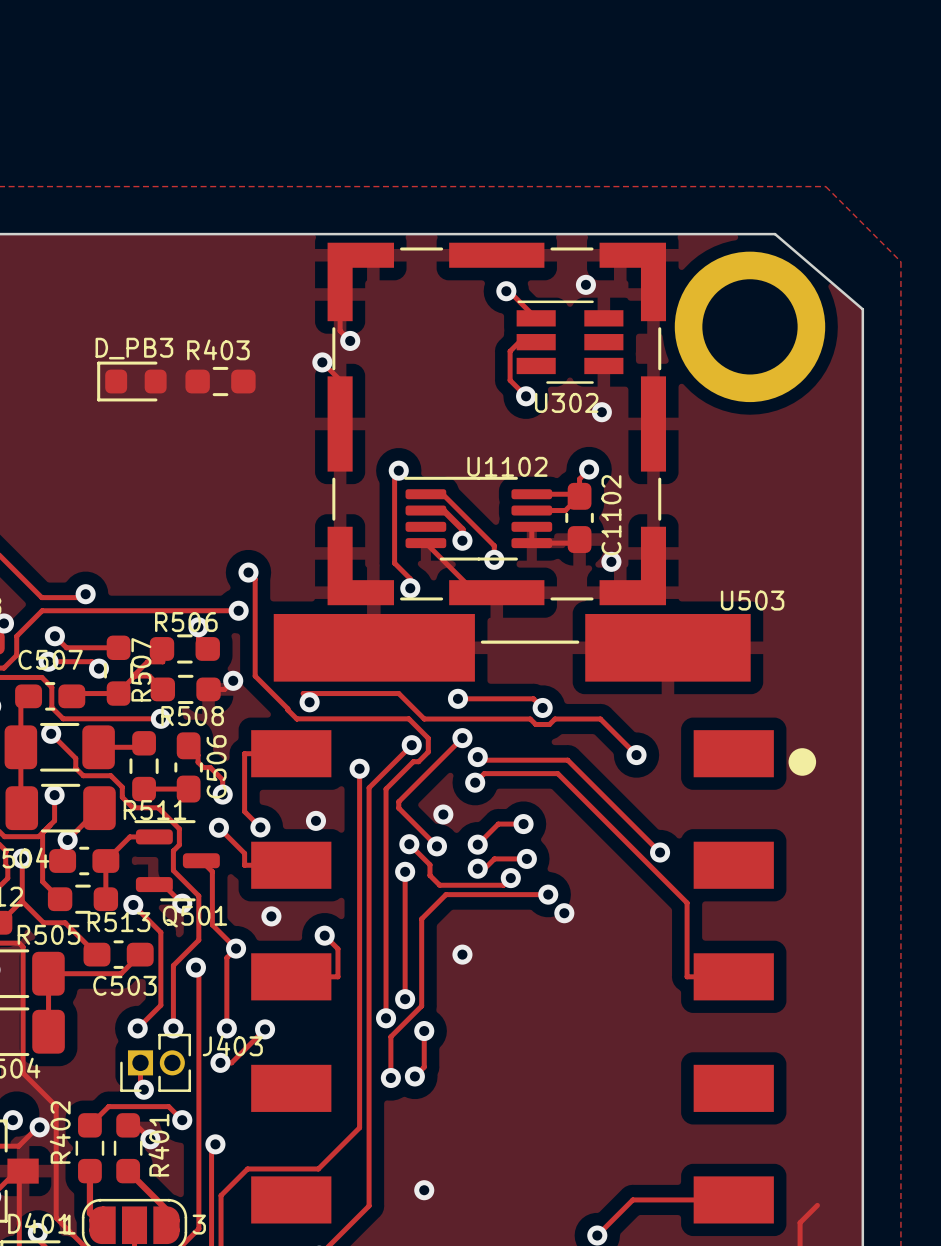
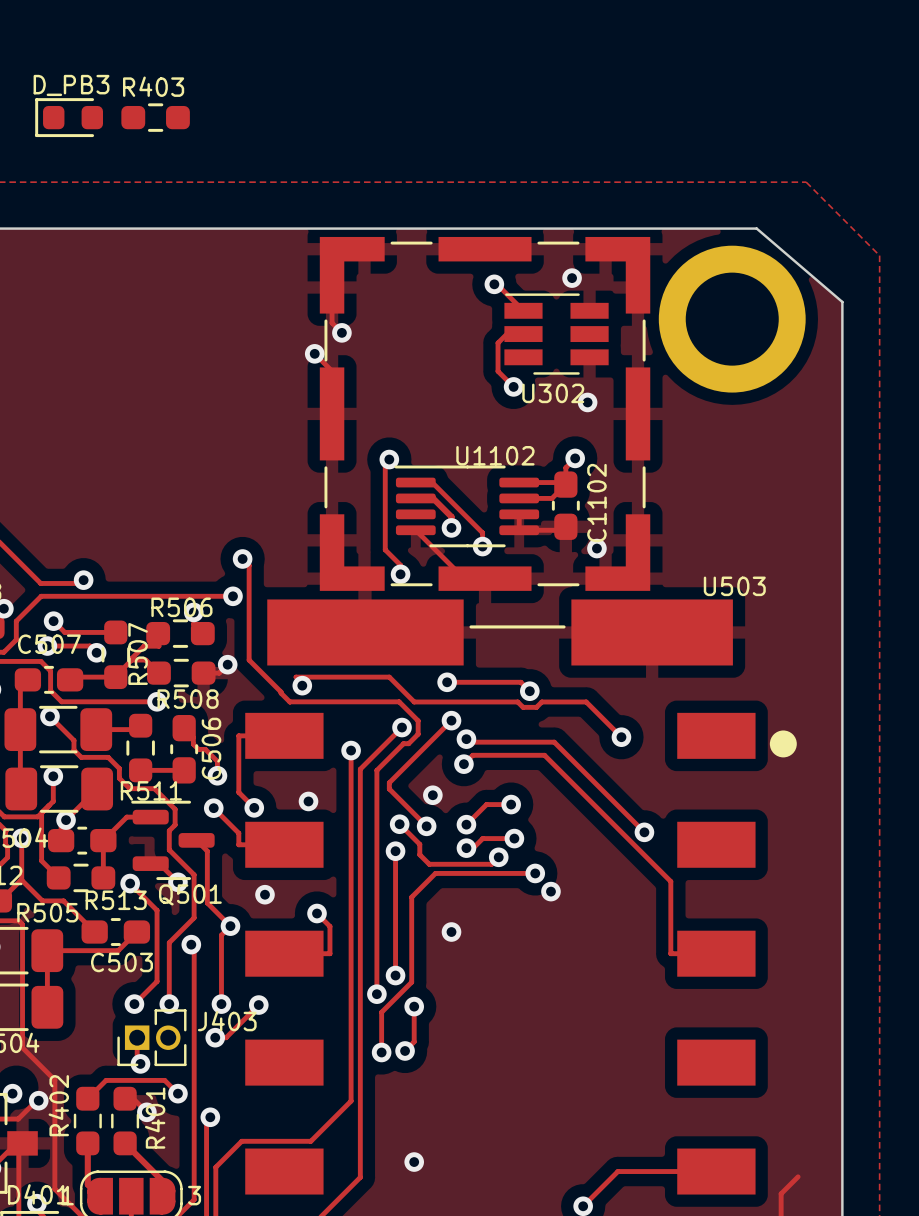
D_PB3 position: (131, 381) -> (69, 117)
R403 position: (220, 381) -> (155, 117)

